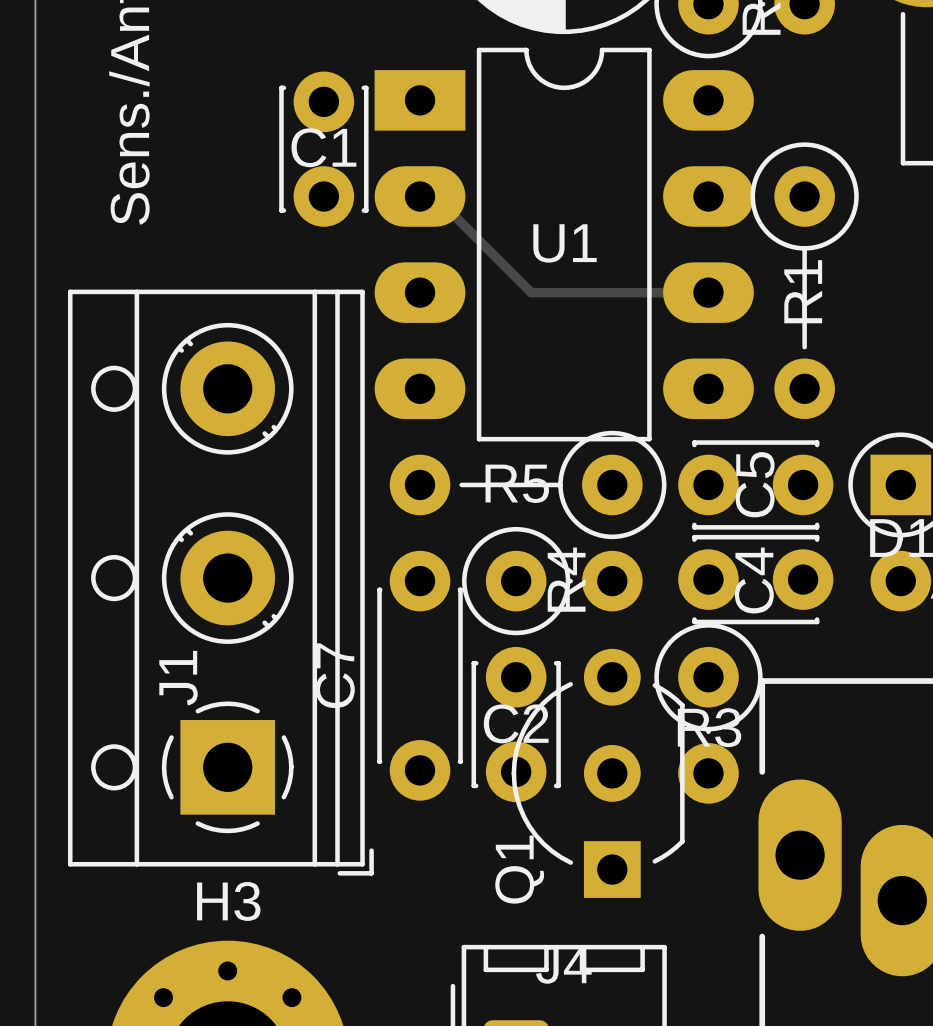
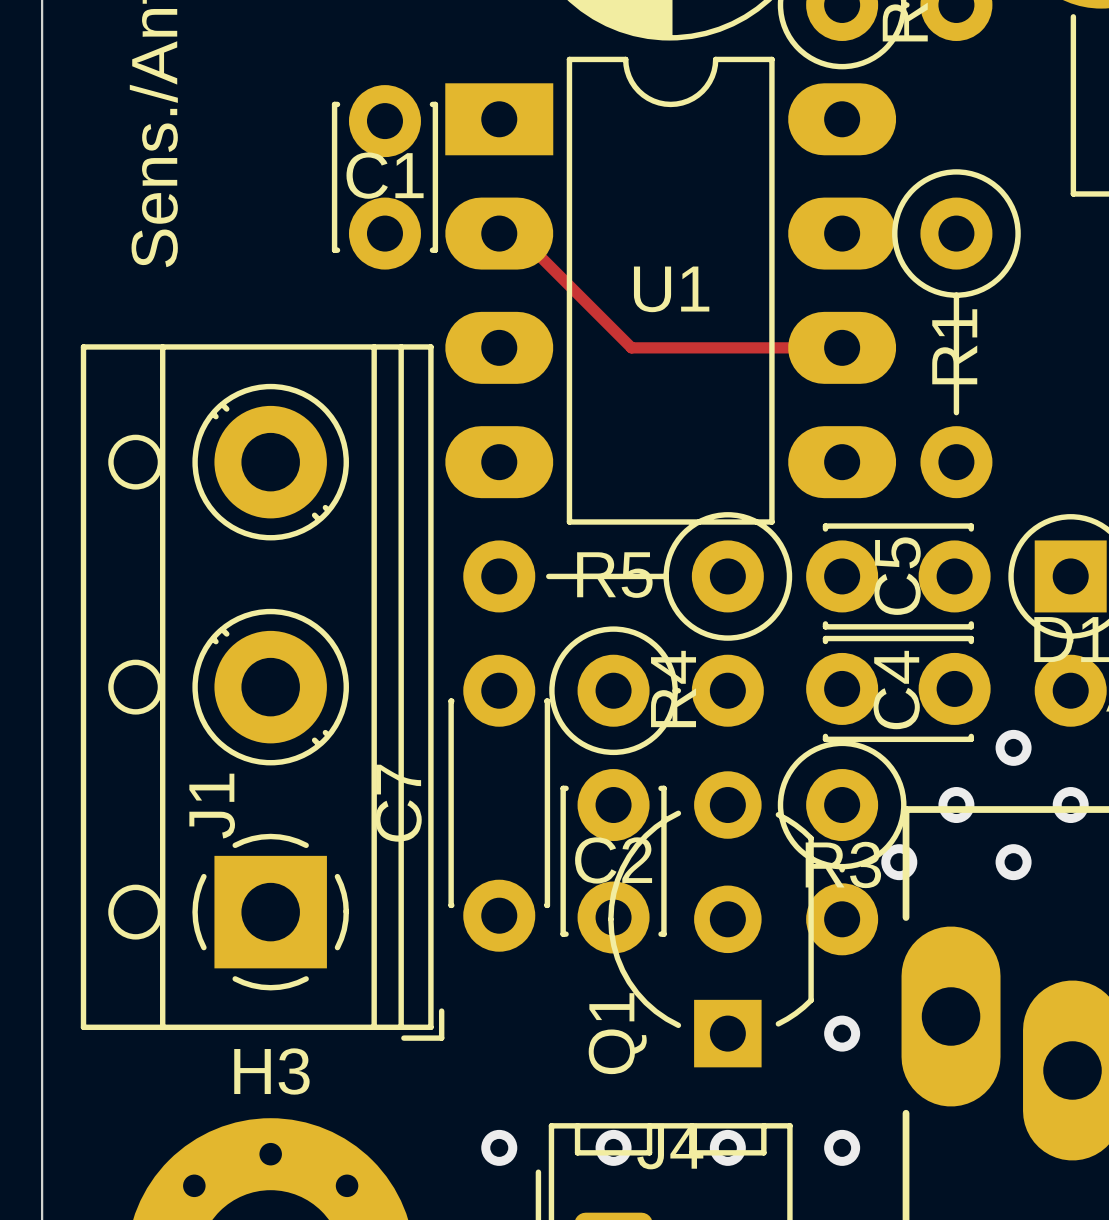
via: none -> (1013, 747)
via: none -> (956, 805)
via: none -> (1070, 805)
via: none -> (899, 862)
via: none -> (1013, 862)
via: none -> (842, 1033)
via: none -> (499, 1147)
via: none -> (613, 1147)
via: none -> (727, 1147)
via: none -> (842, 1147)

